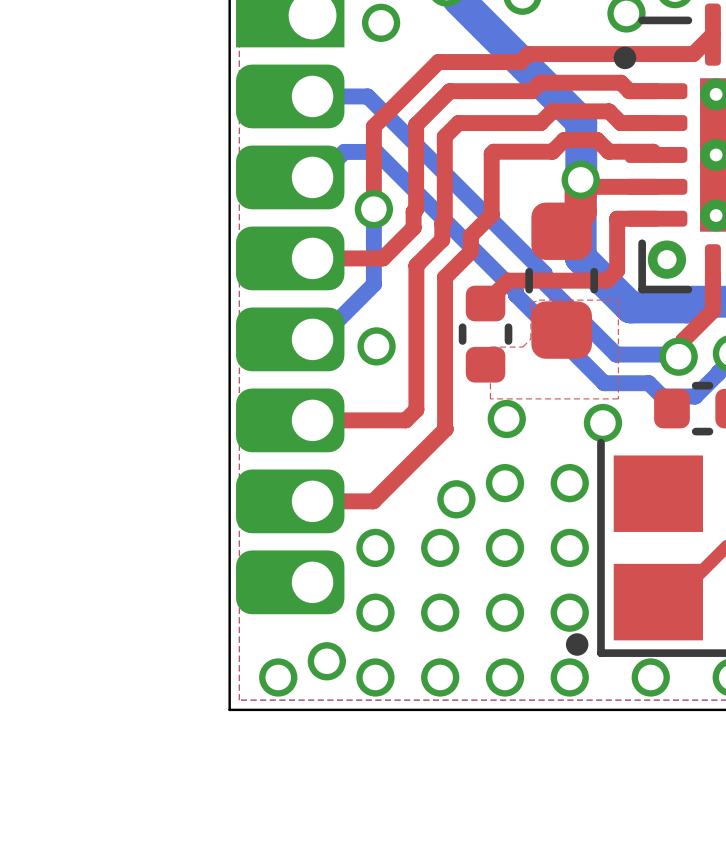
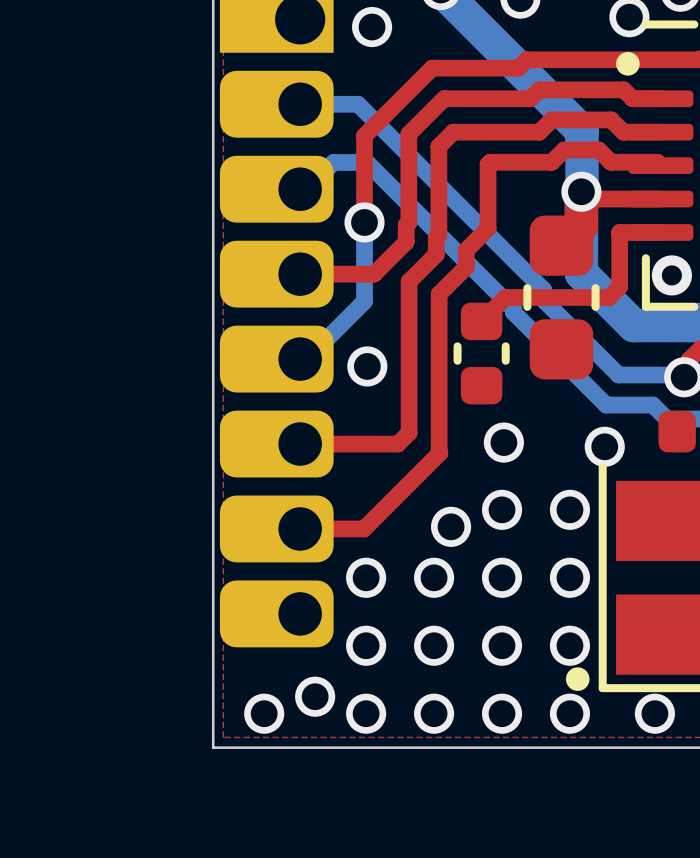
top zone outline: (539, 300) (530, 303) (530, 338) (522, 347) (490, 347) (490, 398) (618, 398) (618, 300) (539, 300) -> none

